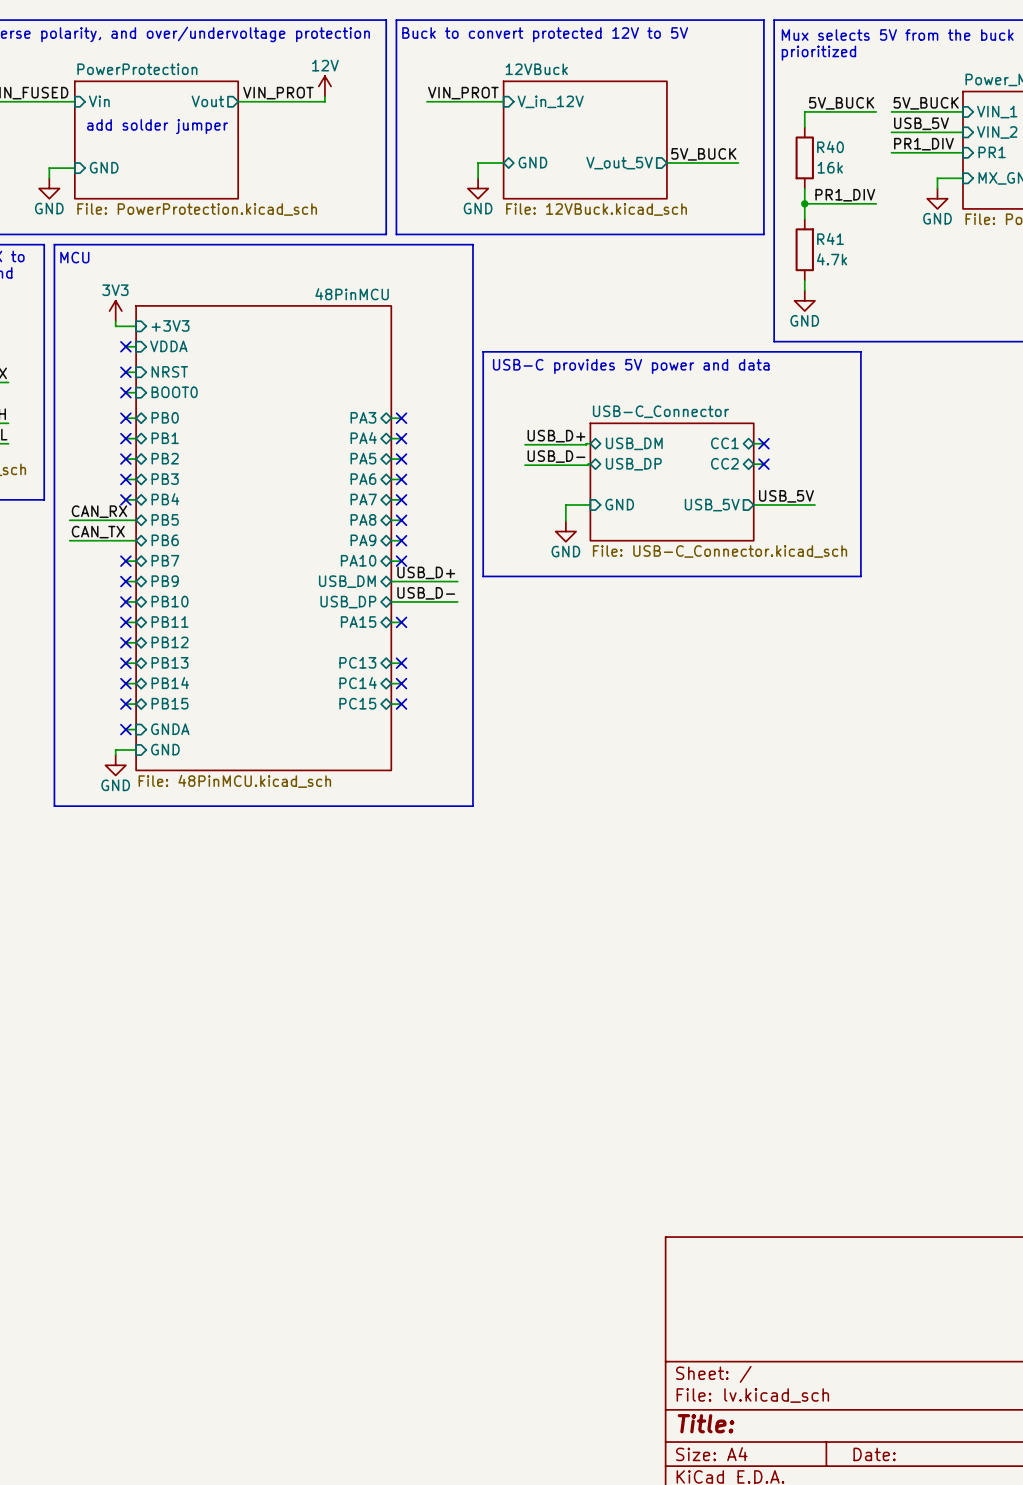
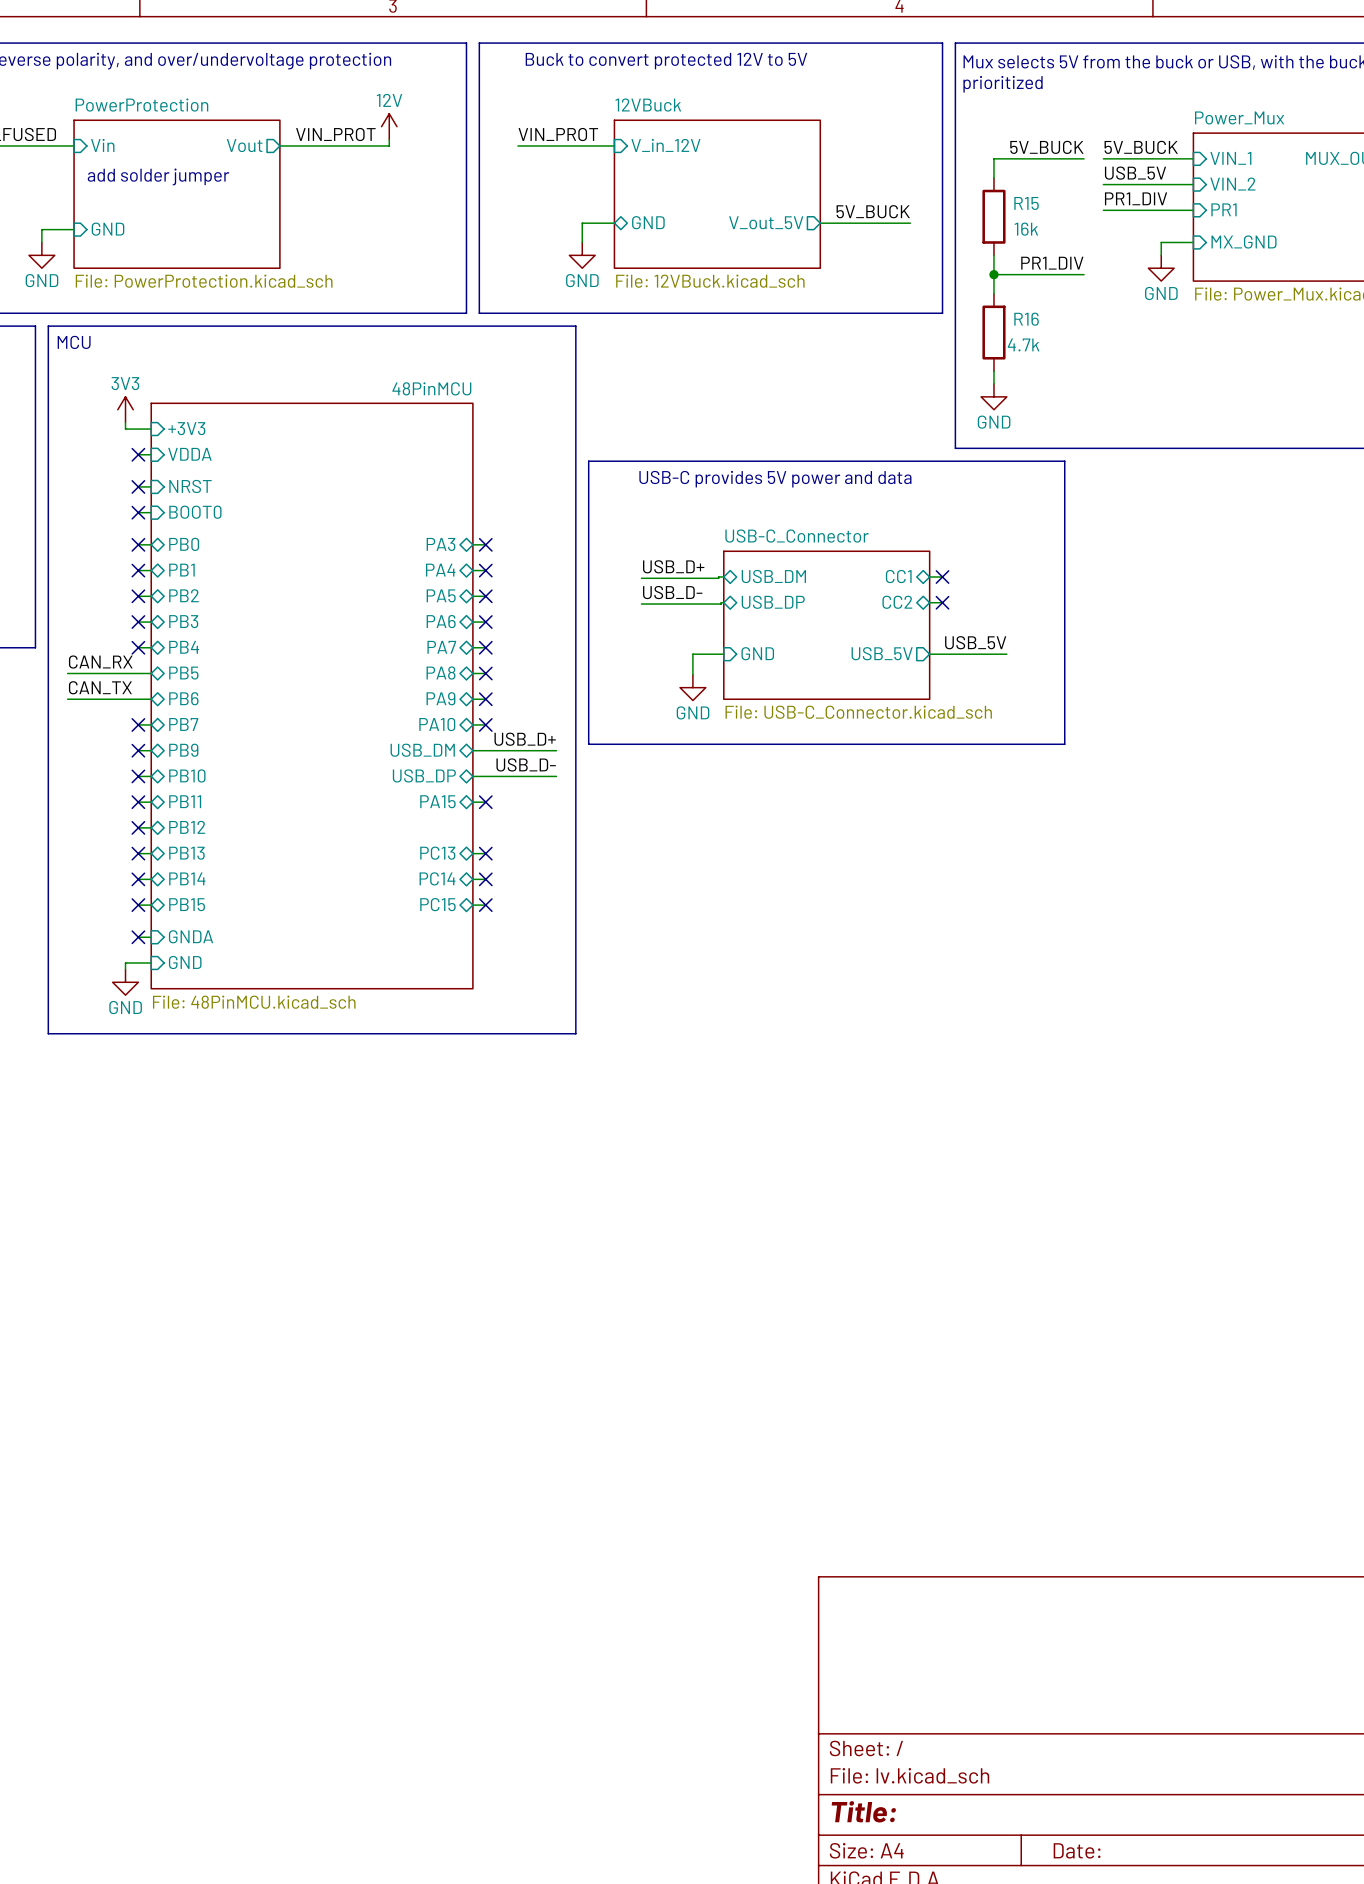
R40 name: R40 (830, 147) -> R15 (1026, 203)
R41 name: R41 (830, 238) -> R16 (1026, 319)

